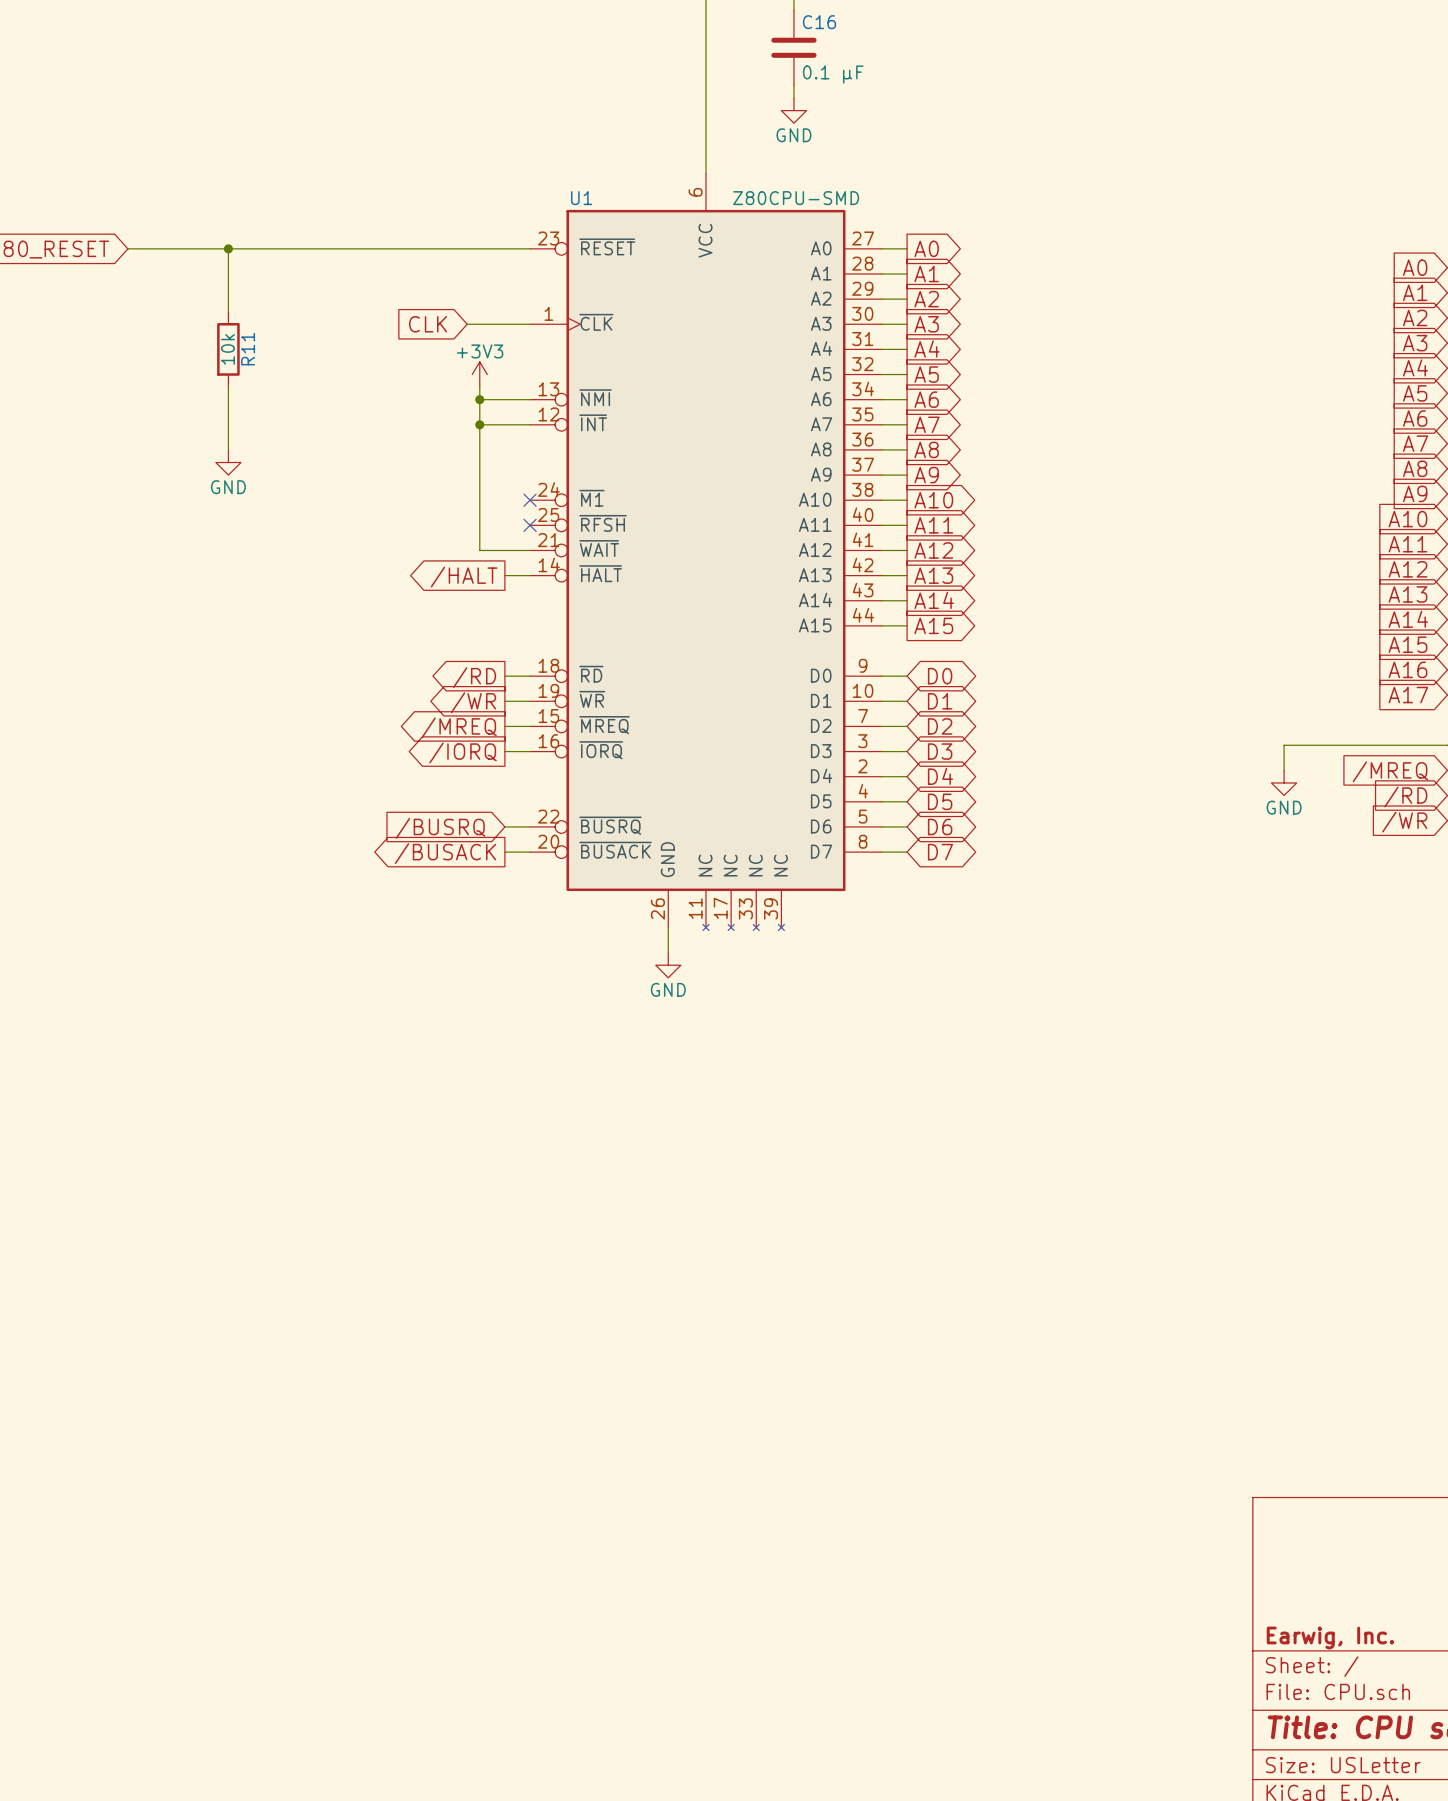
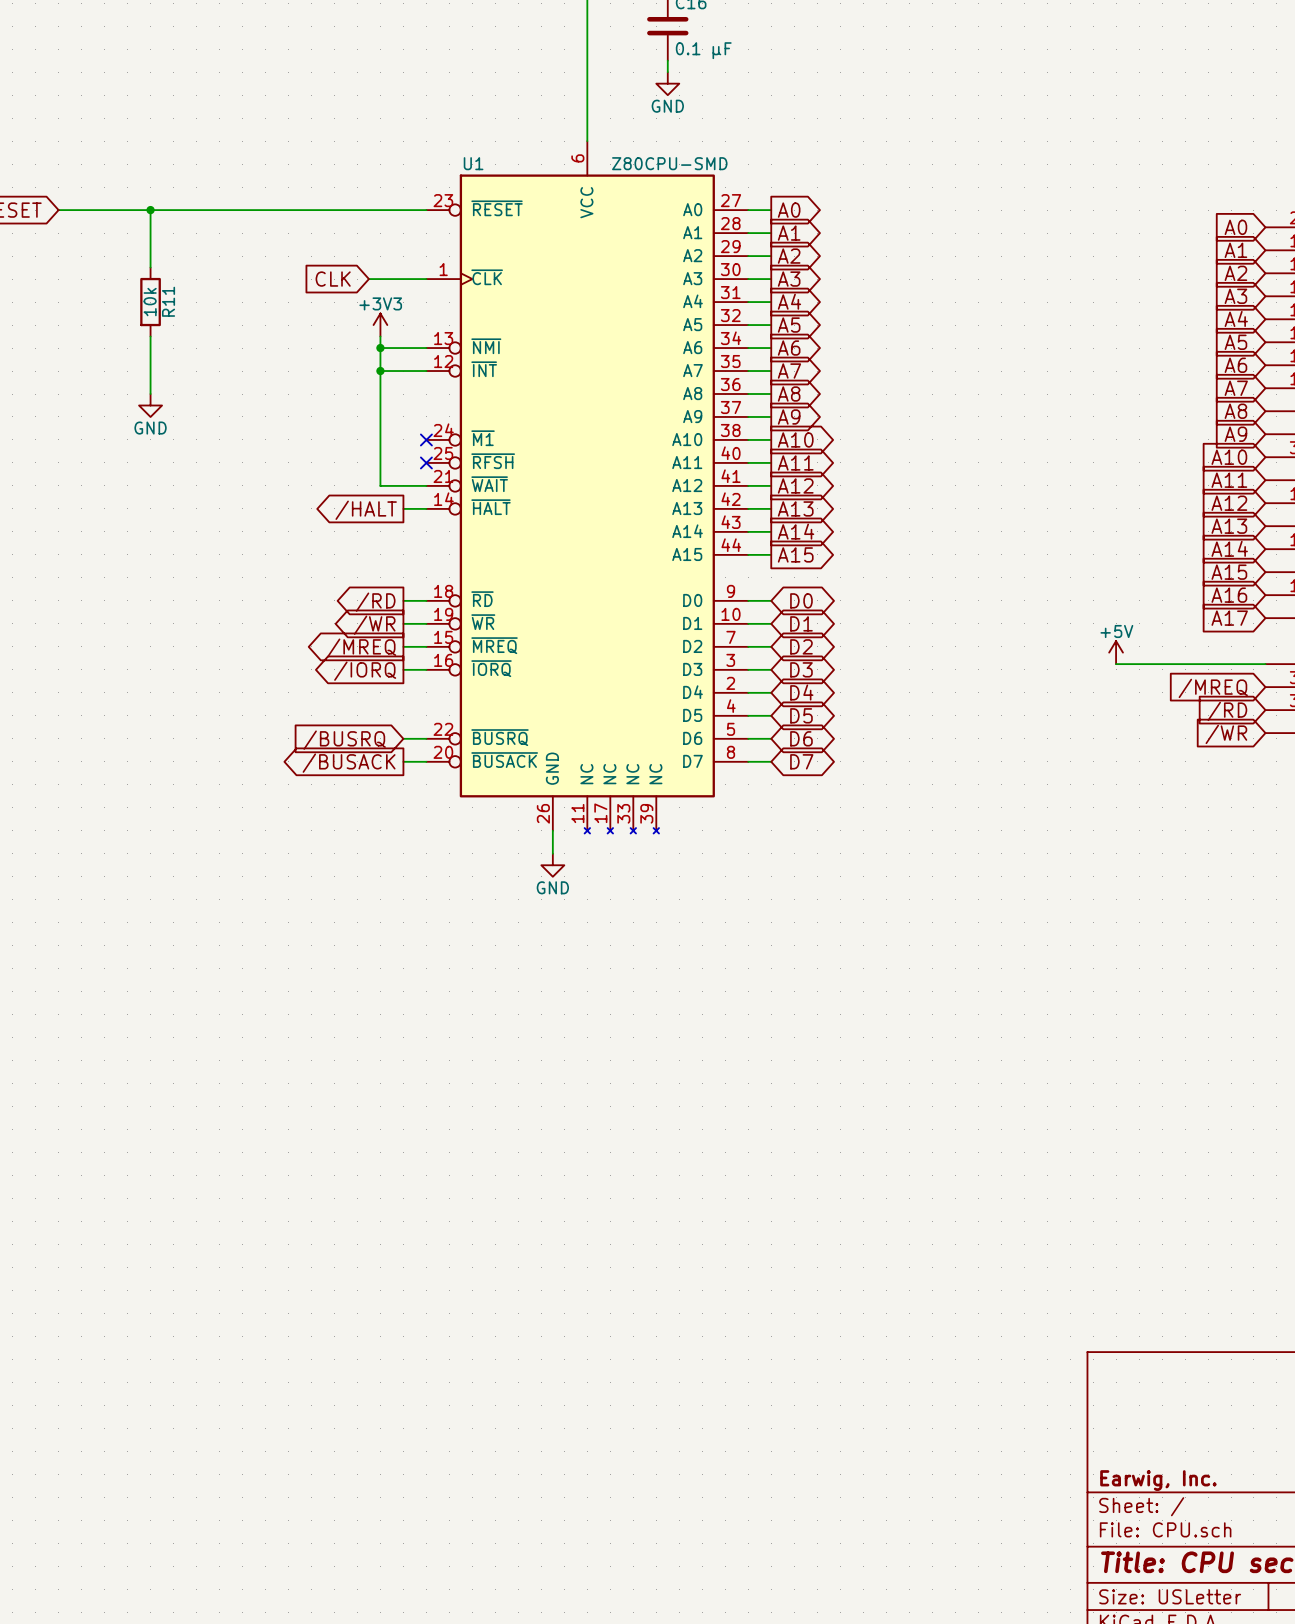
power symbol: none -> +5V (1116, 652)
wire: (1284, 745) (1284, 770) -> none
power symbol: GND (1284, 782) -> none

